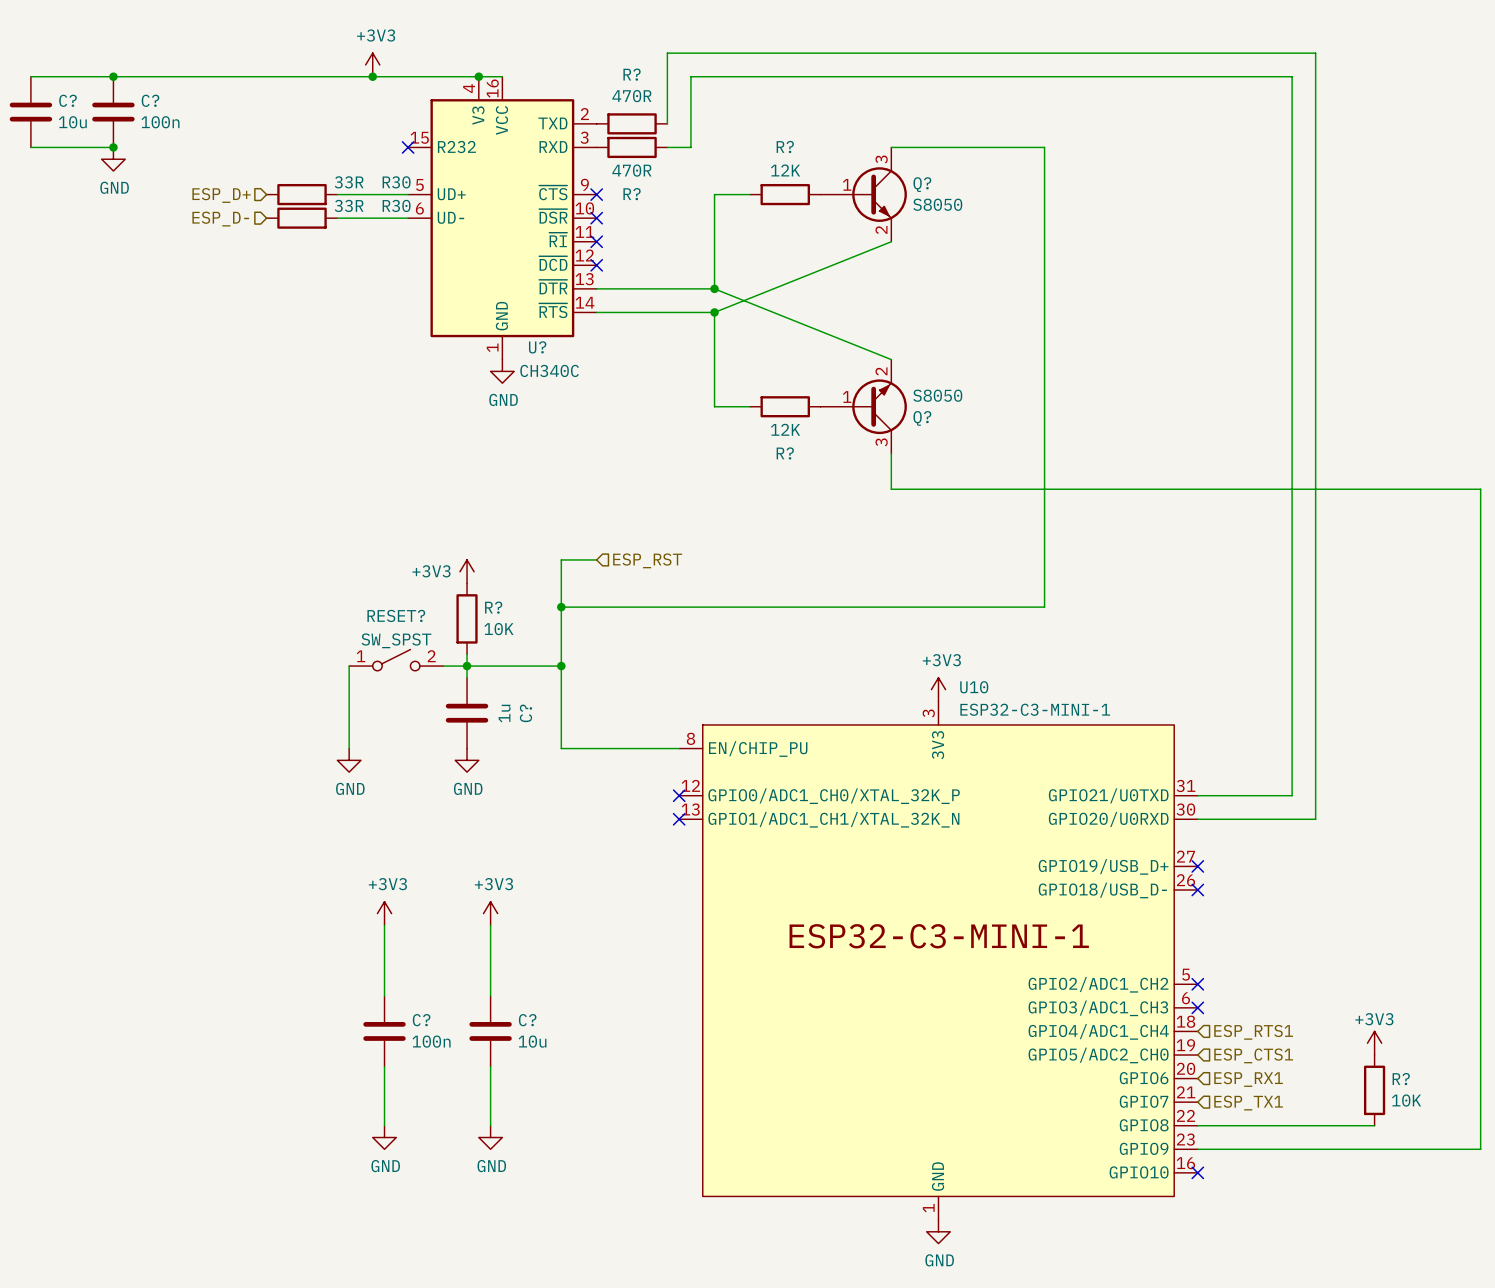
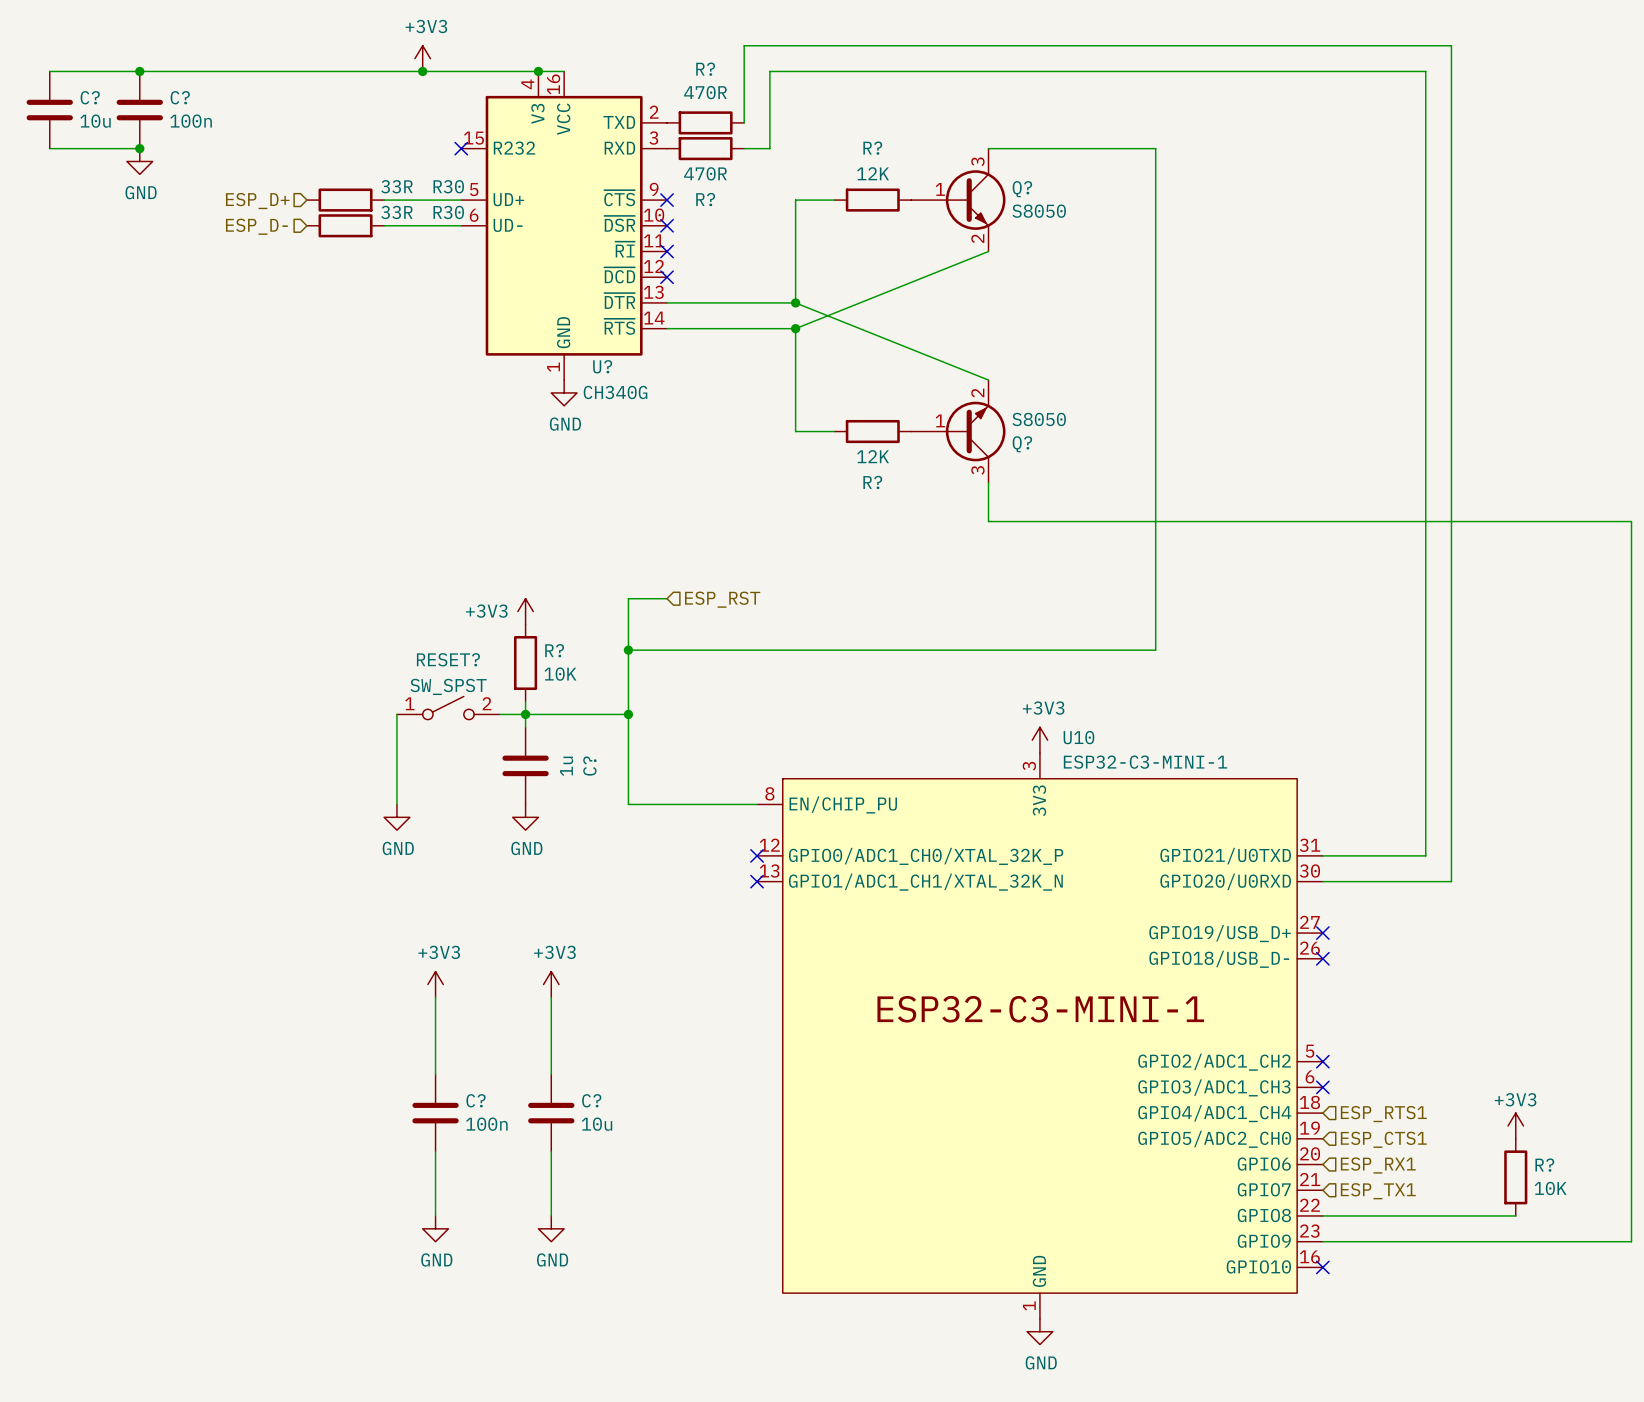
U? value: CH340C (549, 370) -> CH340G (615, 392)

